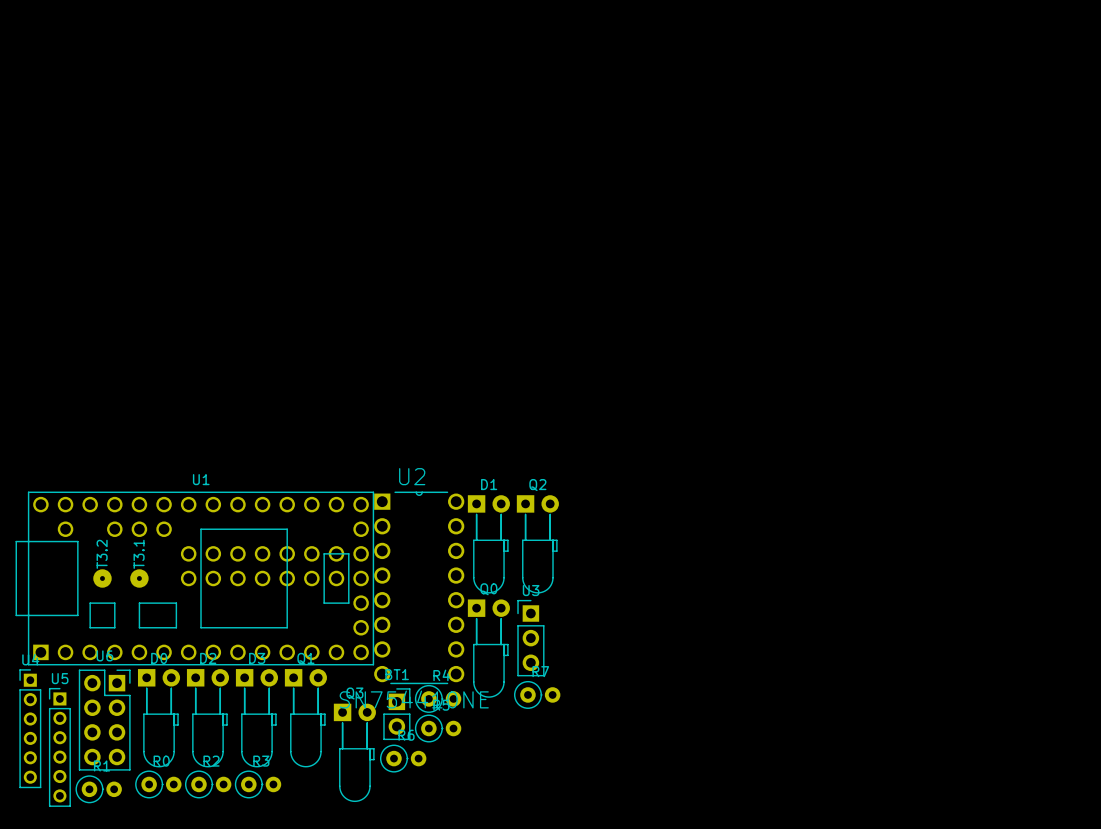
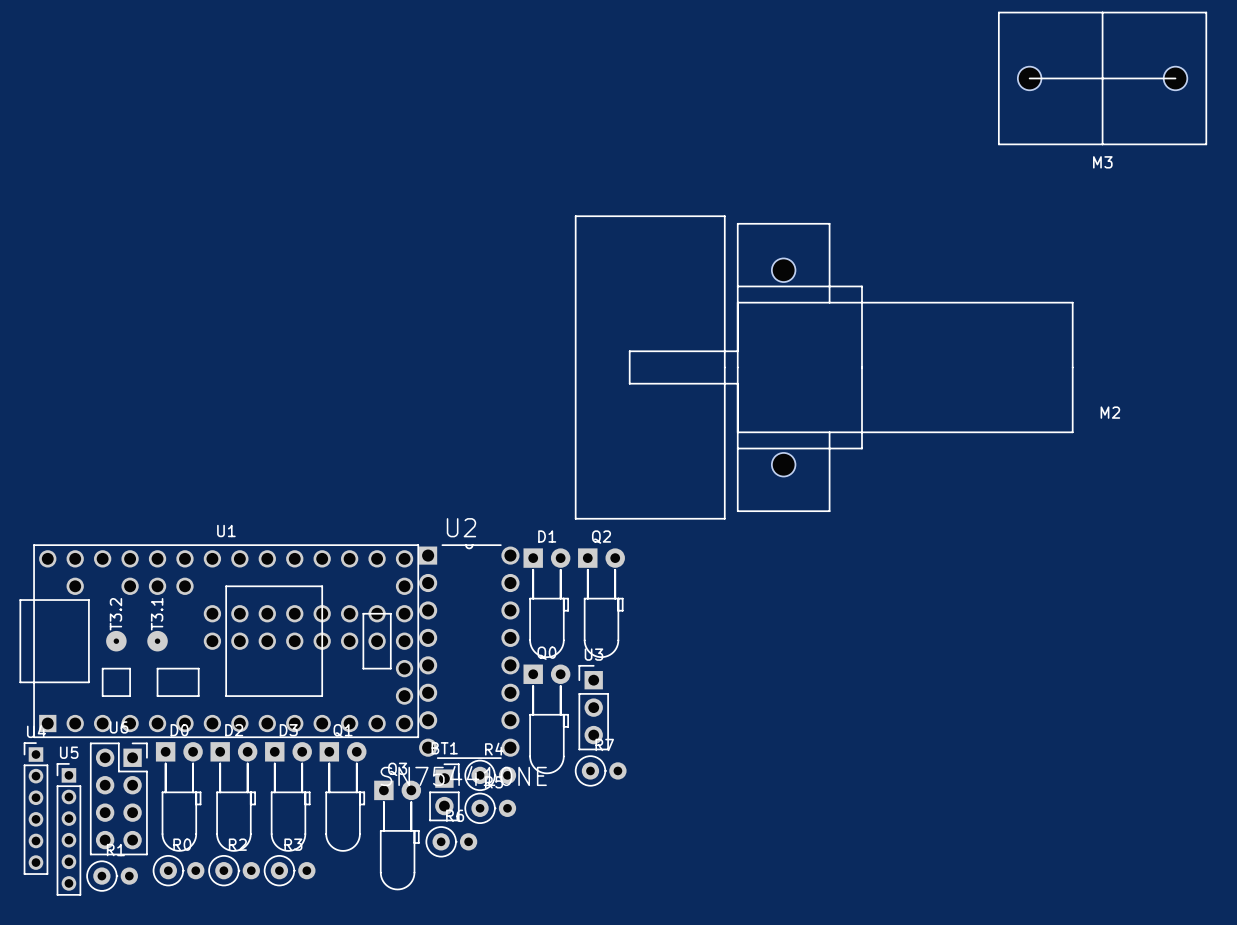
M3: none -> (1102, 78)
M2: none -> (824, 367)

